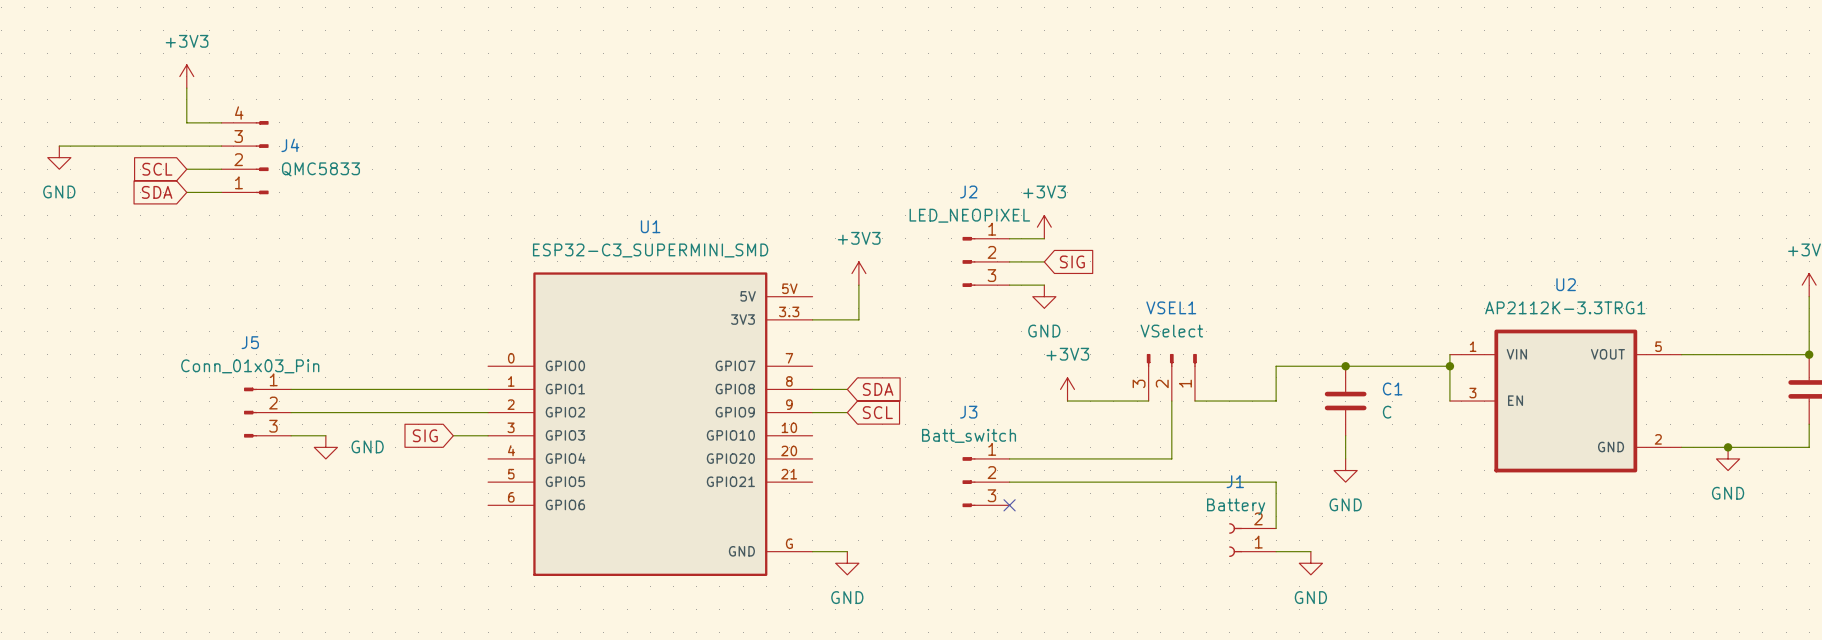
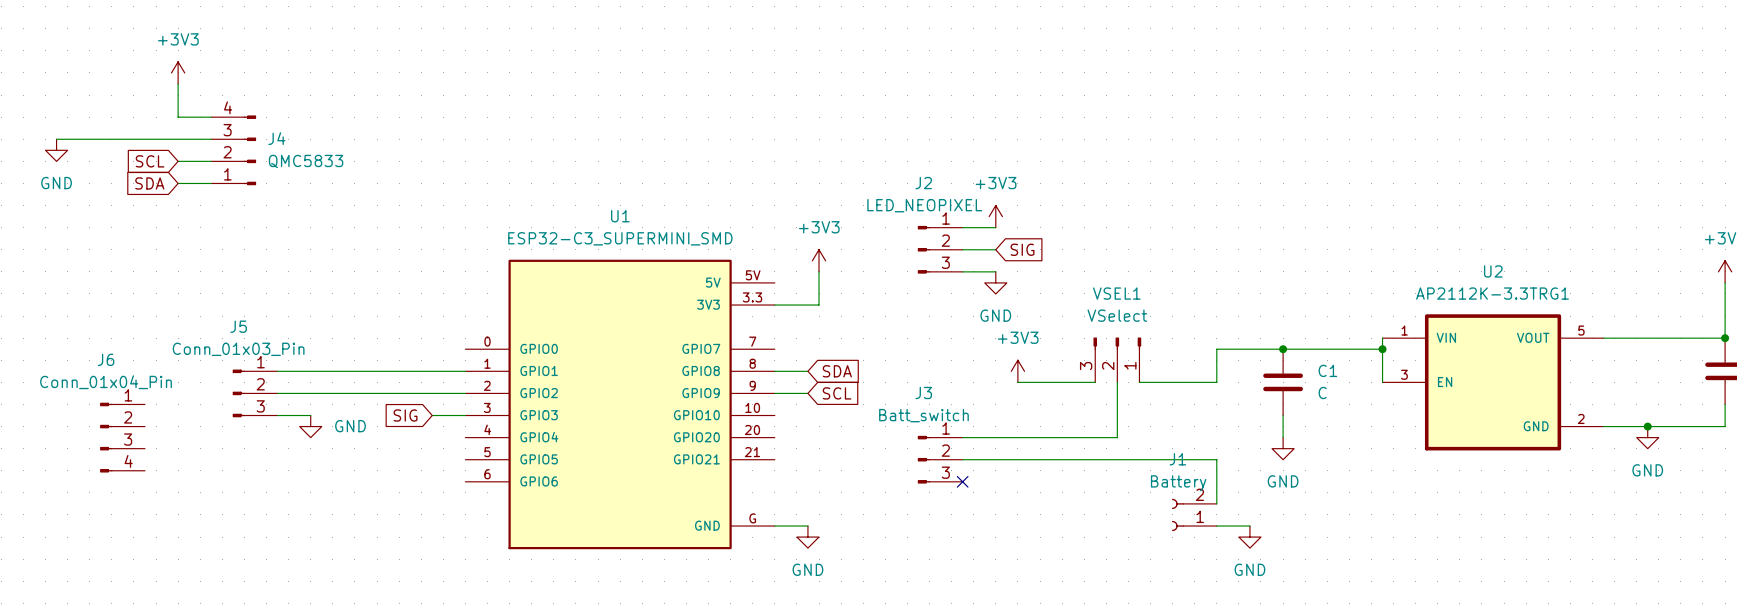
J6: none -> Conn_01x04_Pin (122, 437)

